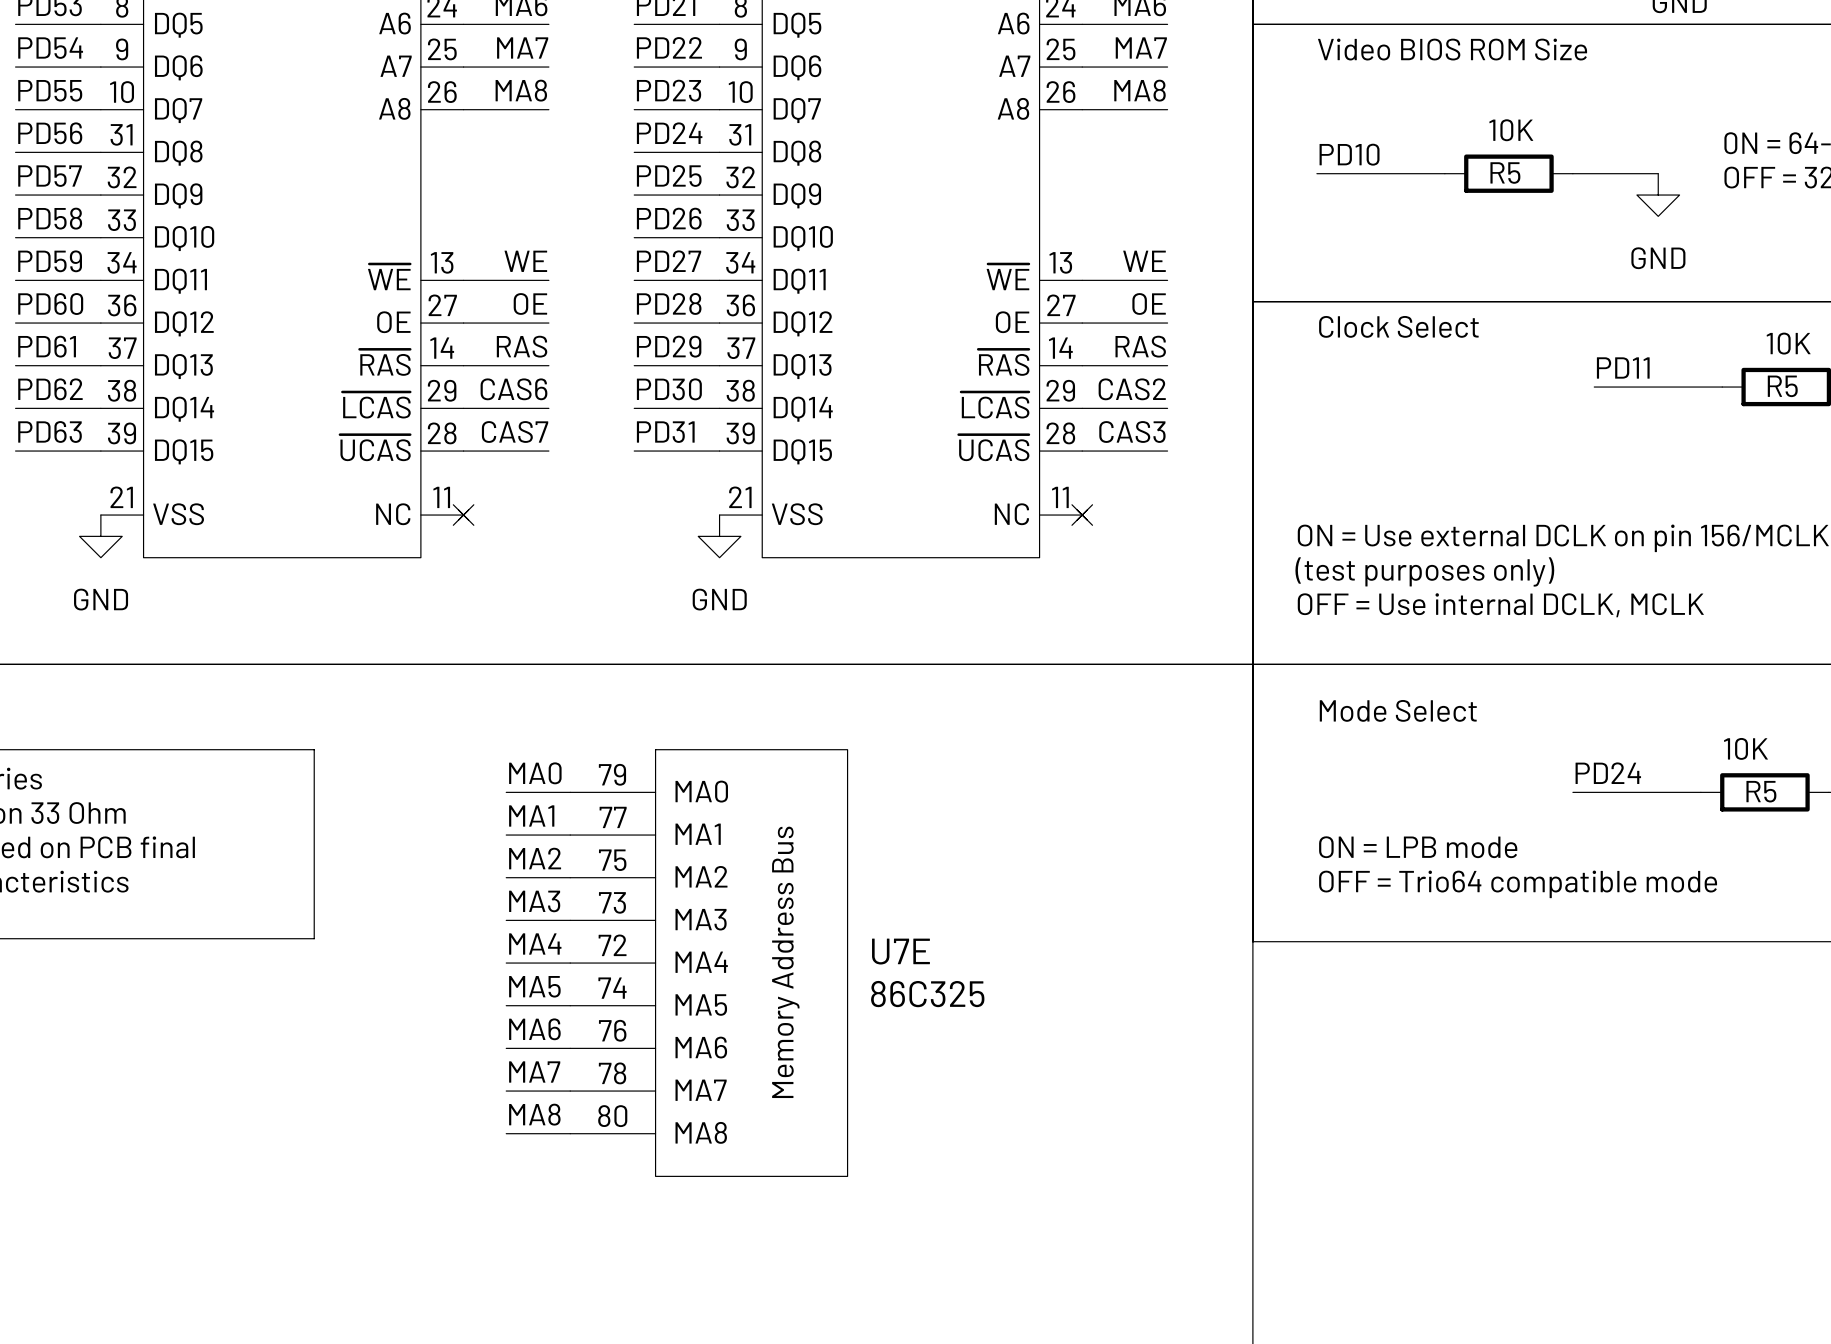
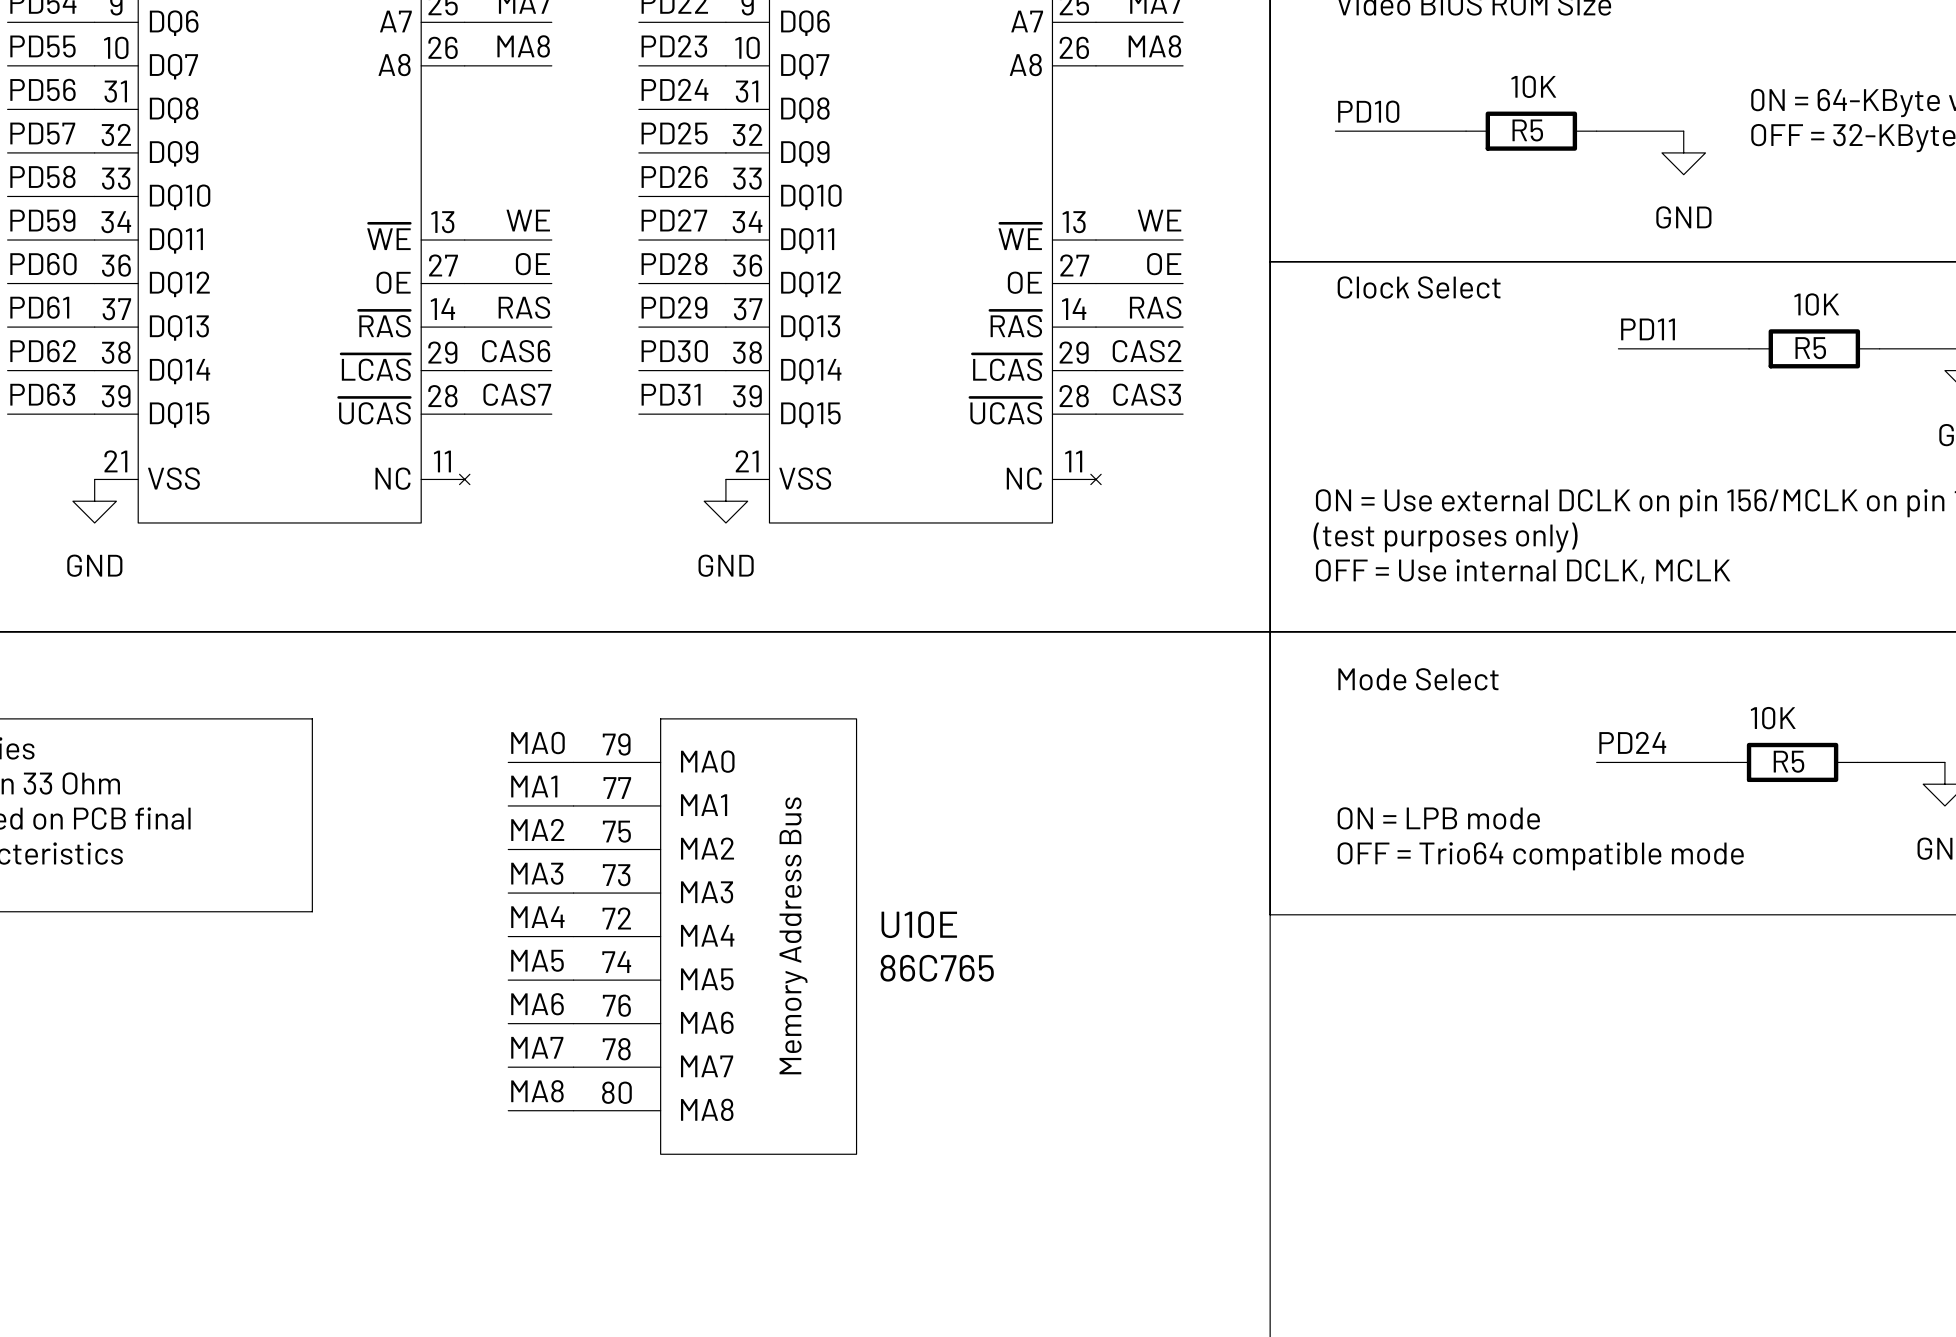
no-connect mark: (463, 515) -> none
no-connect mark: (1082, 515) -> none
U7E name: U7E (900, 951) -> U10E (919, 924)
U7E value: 86C325 (927, 994) -> 86C765 (937, 968)

